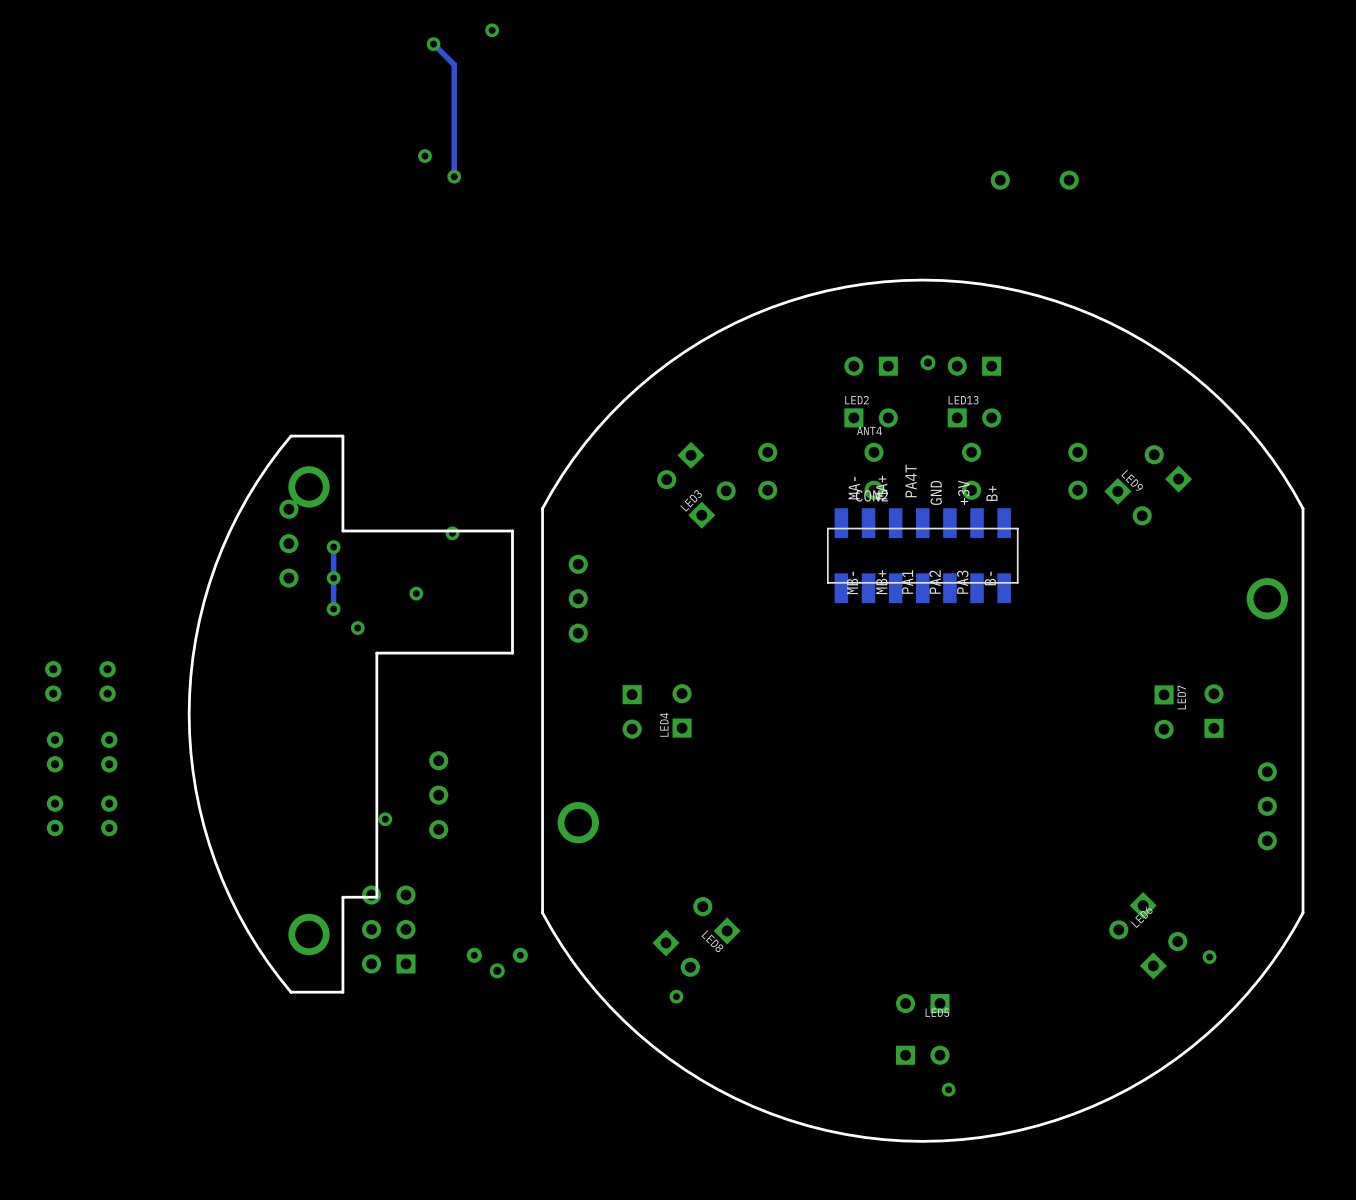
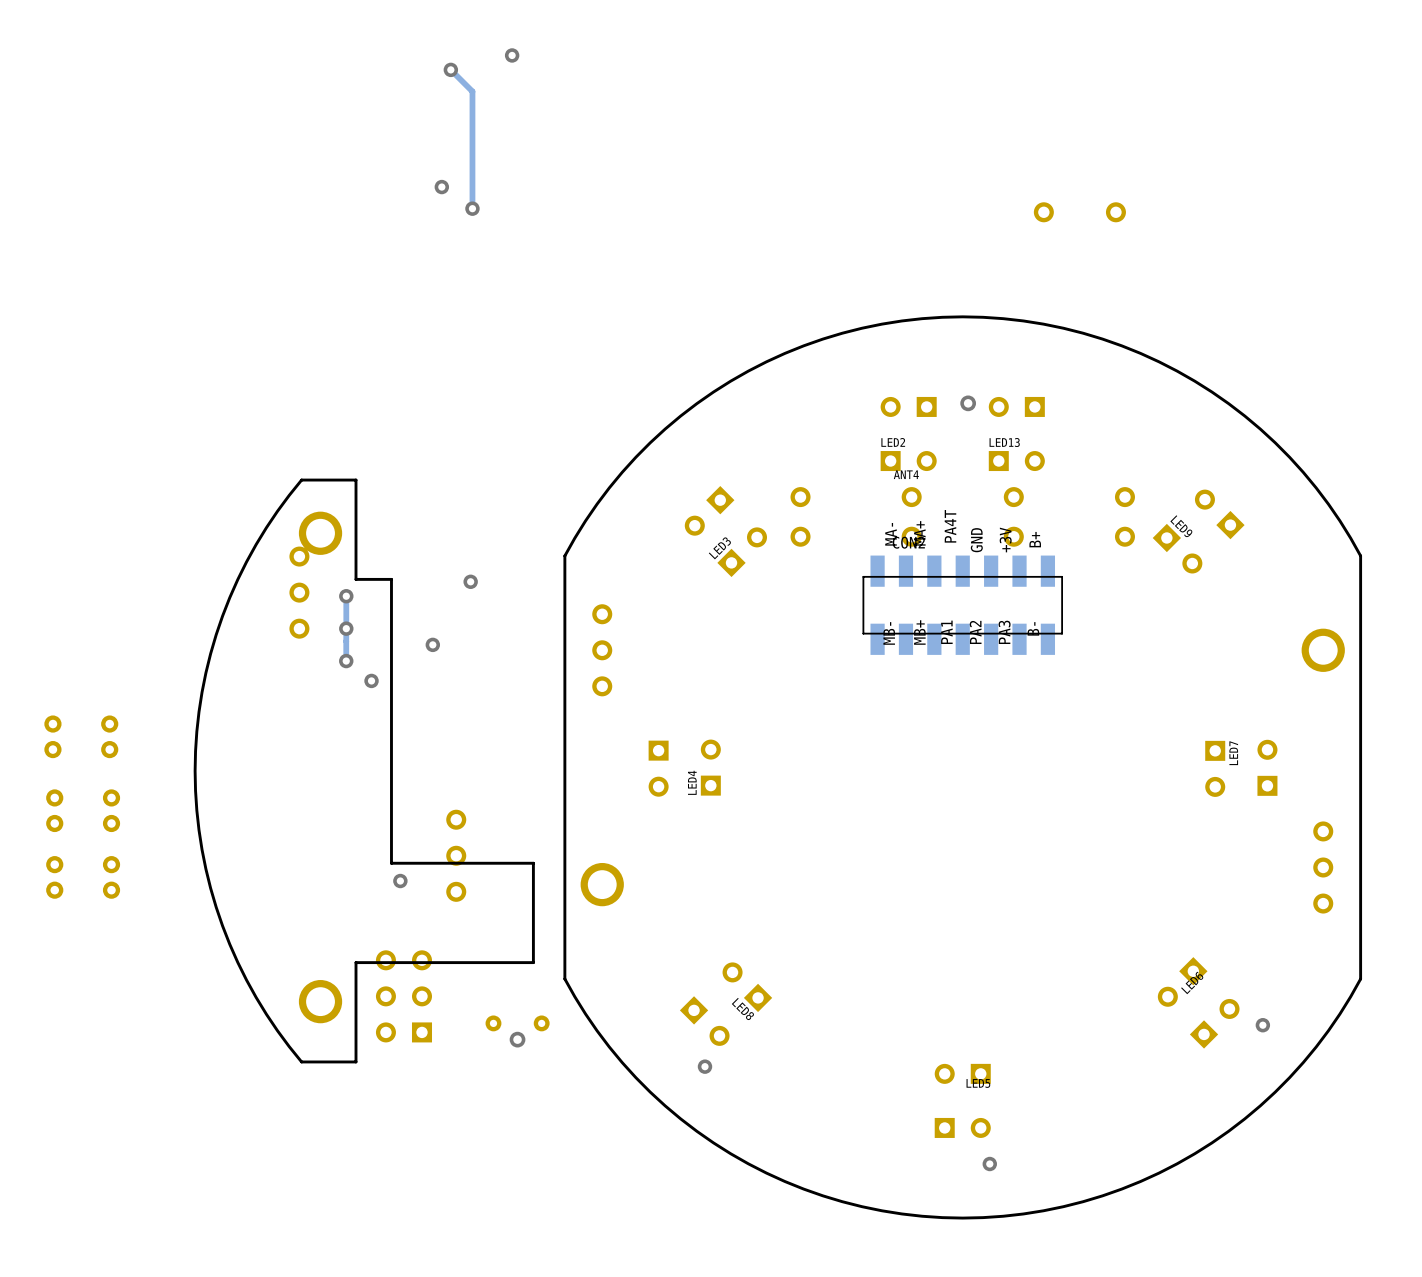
board edge: (376, 531) (512, 531) (512, 653) (376, 653) -> (391, 579) (391, 707)
board edge: (376, 802) (376, 897) -> (391, 863) (533, 863) (533, 962) (391, 962)

